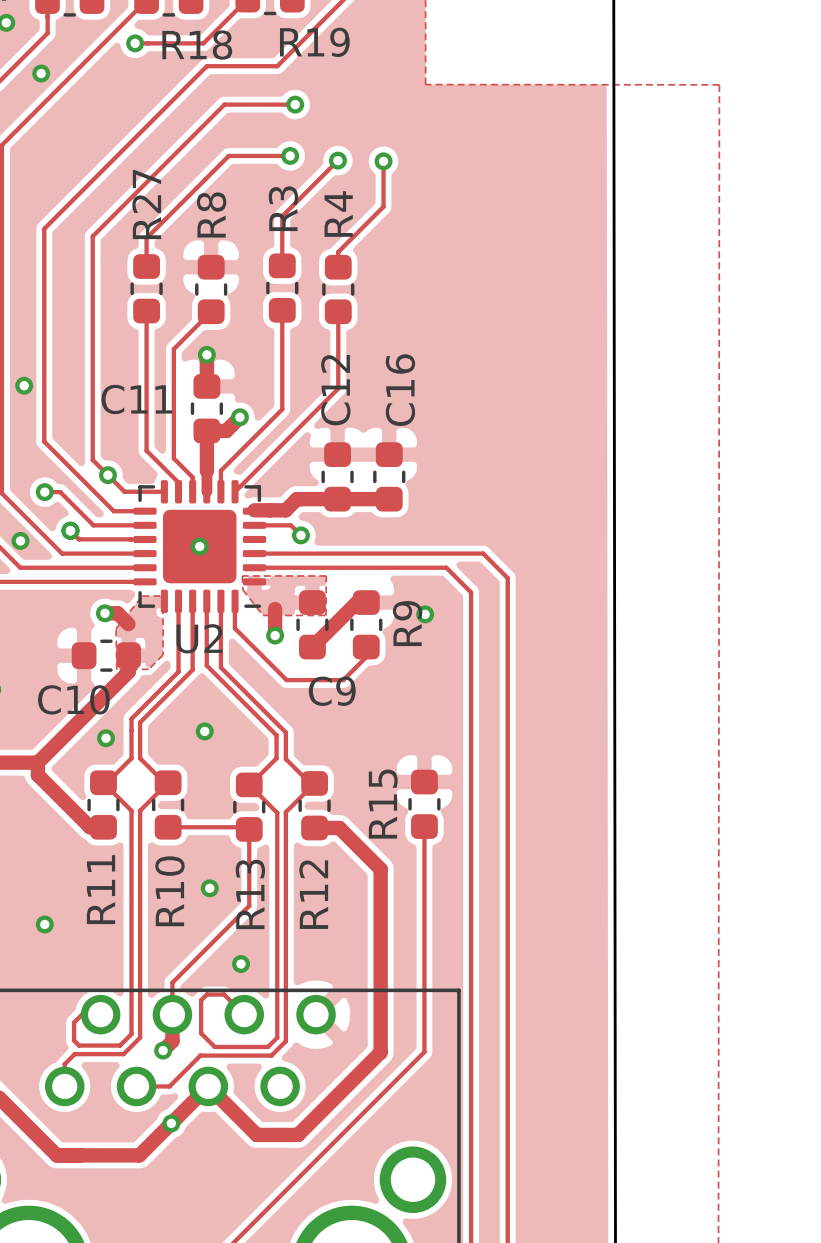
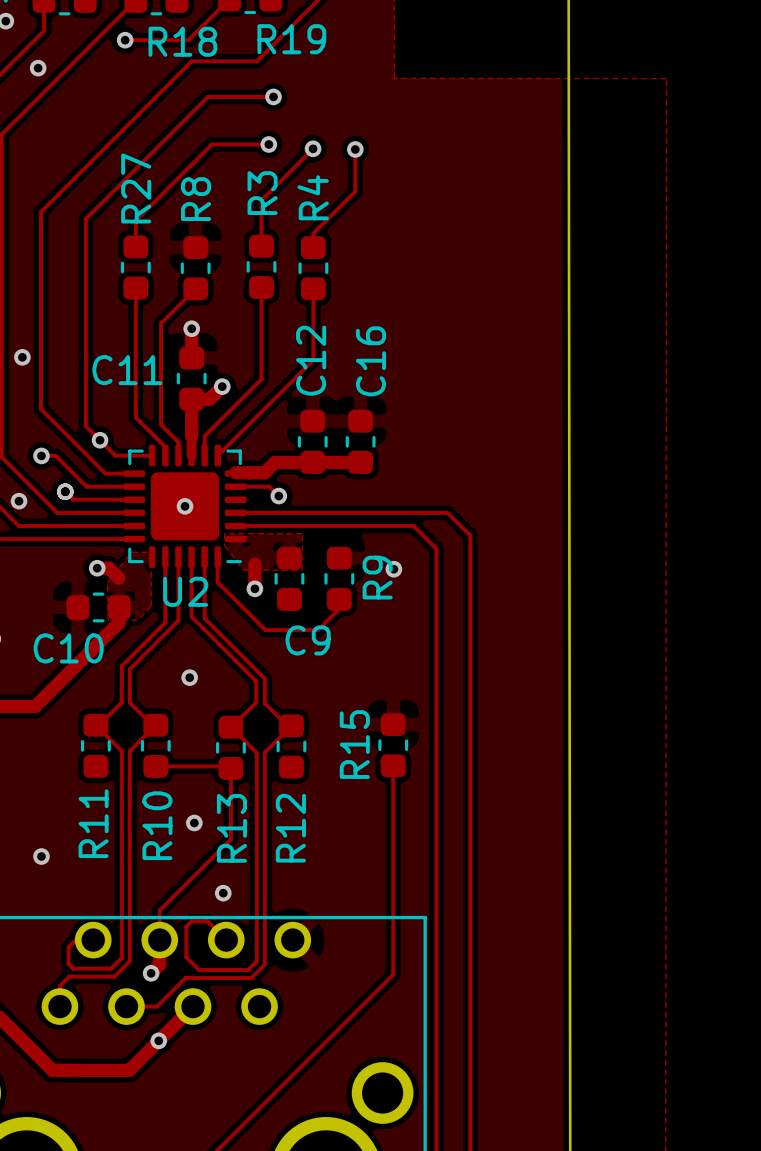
track: (366, 602) (356, 602) (312, 647) -> none
via: (106, 738) -> none
track: (37, 762) (37, 775) (90, 827) (103, 827) -> none
track: (314, 827) (339, 827) (380, 869) (380, 1052) (298, 1134) (256, 1134) (208, 1086) -> none

